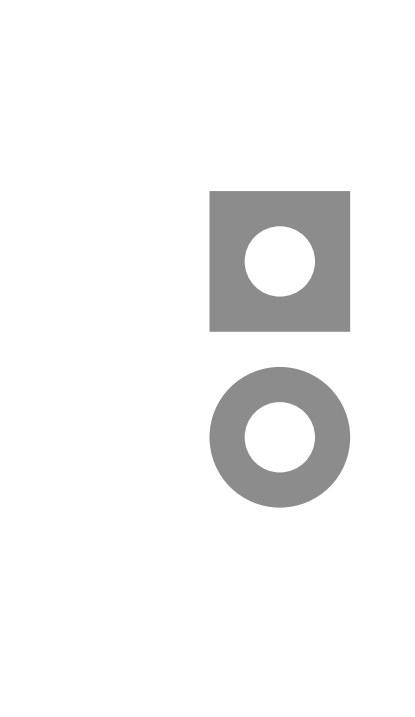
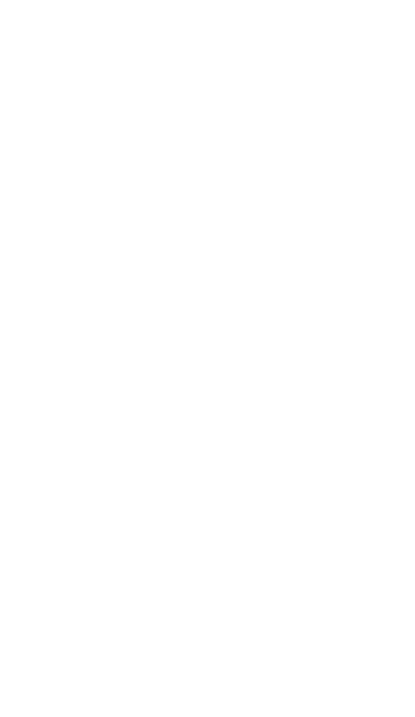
part: (279, 349) -> none

